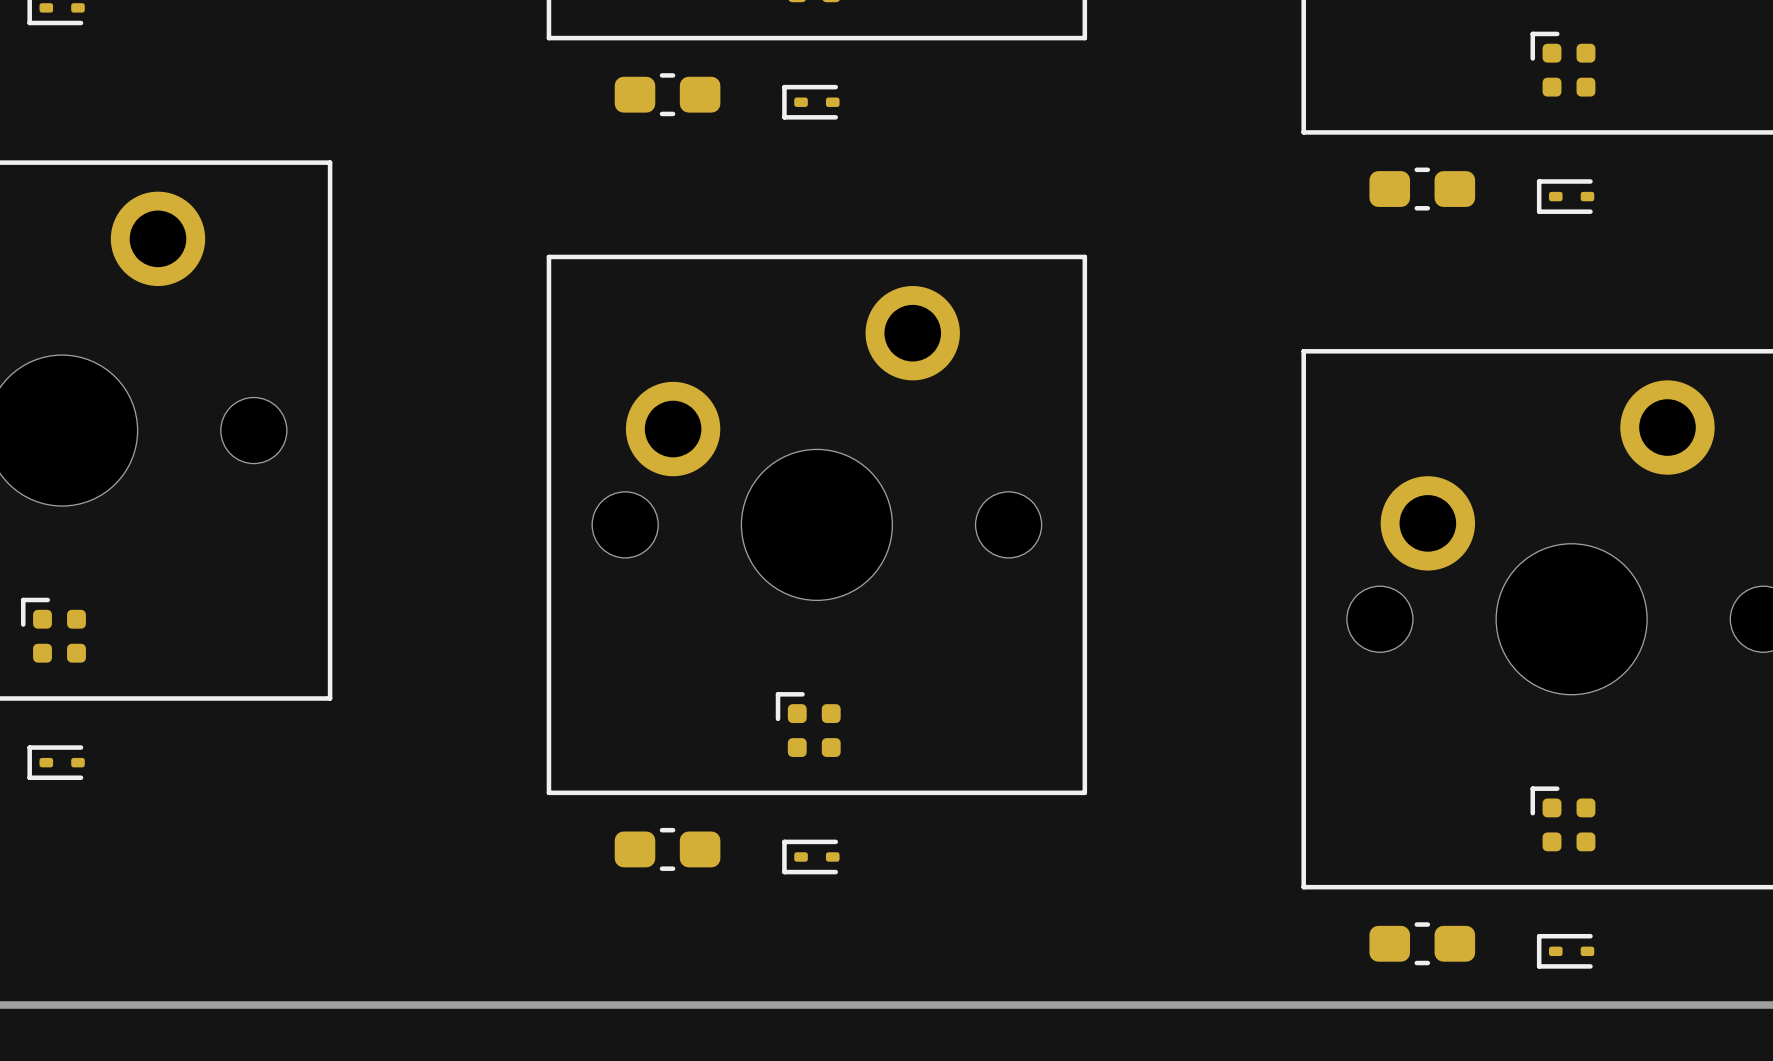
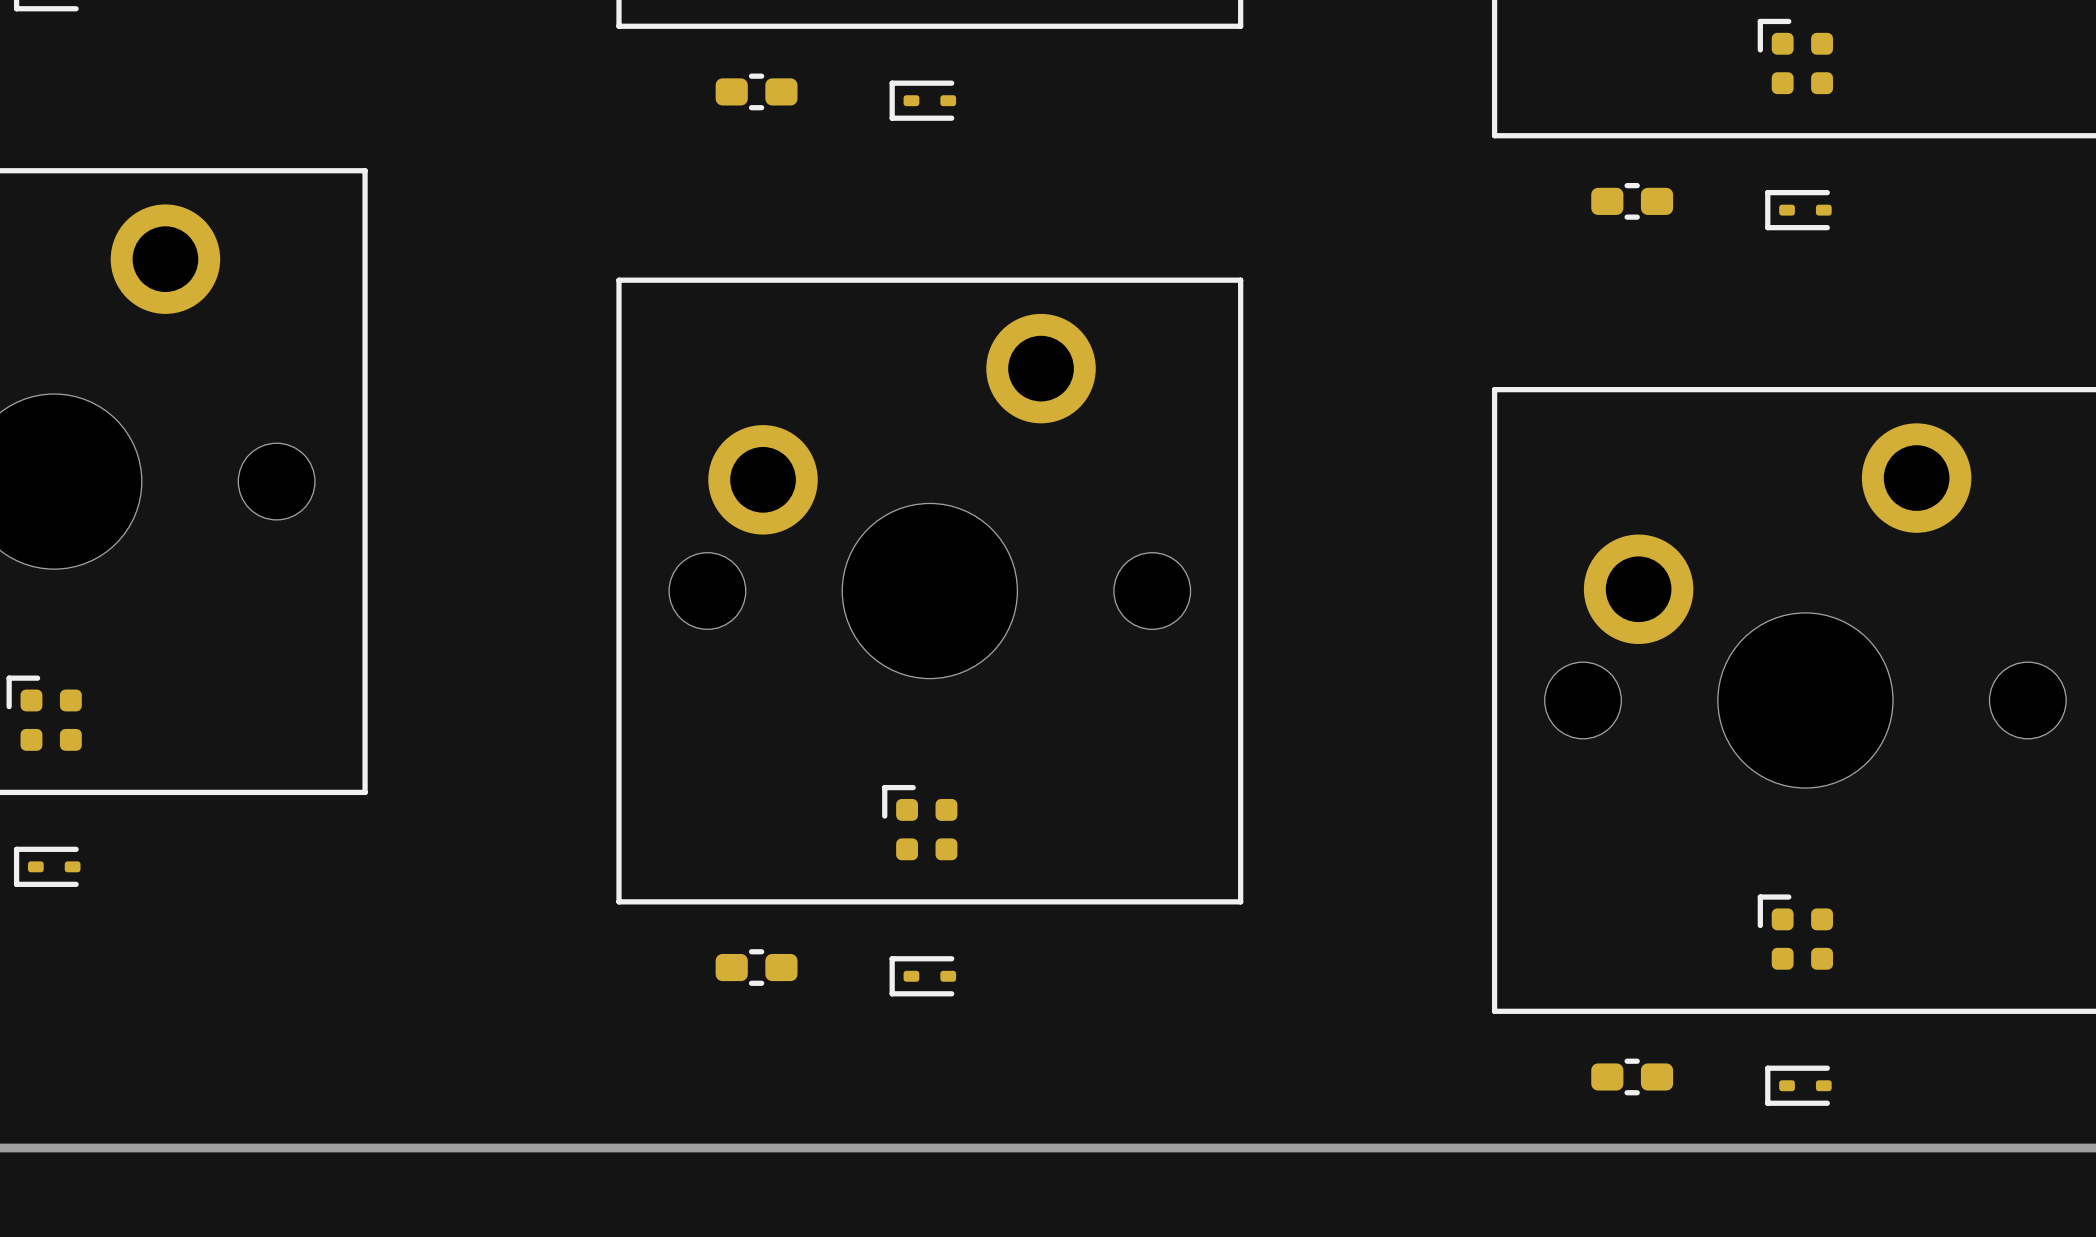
part footprint: [614, 73, 721, 117] -> [715, 73, 798, 111]
part footprint: [1369, 167, 1476, 211] -> [1591, 182, 1674, 220]
part footprint: [614, 827, 721, 871] -> [715, 949, 798, 986]
part footprint: [1369, 922, 1476, 966] -> [1591, 1058, 1674, 1096]

